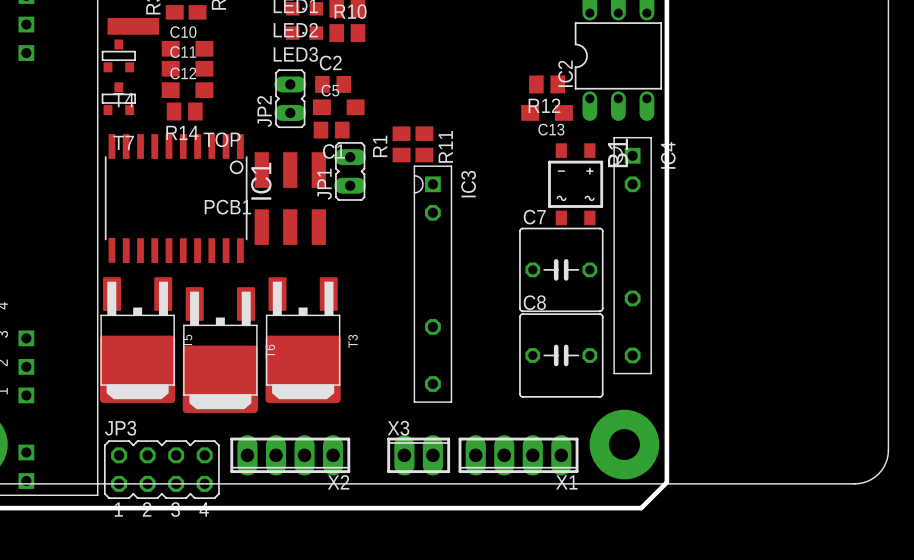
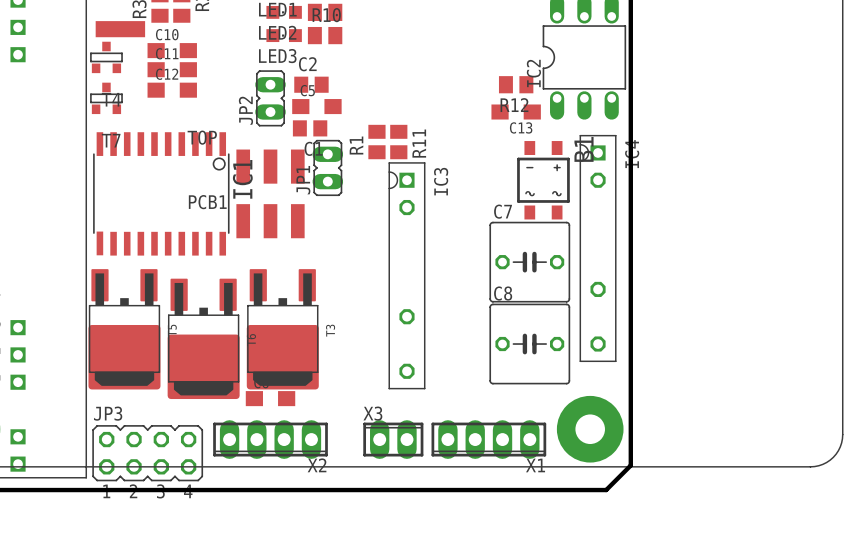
R14: (184, 111) -> none
part: none -> (270, 398)

